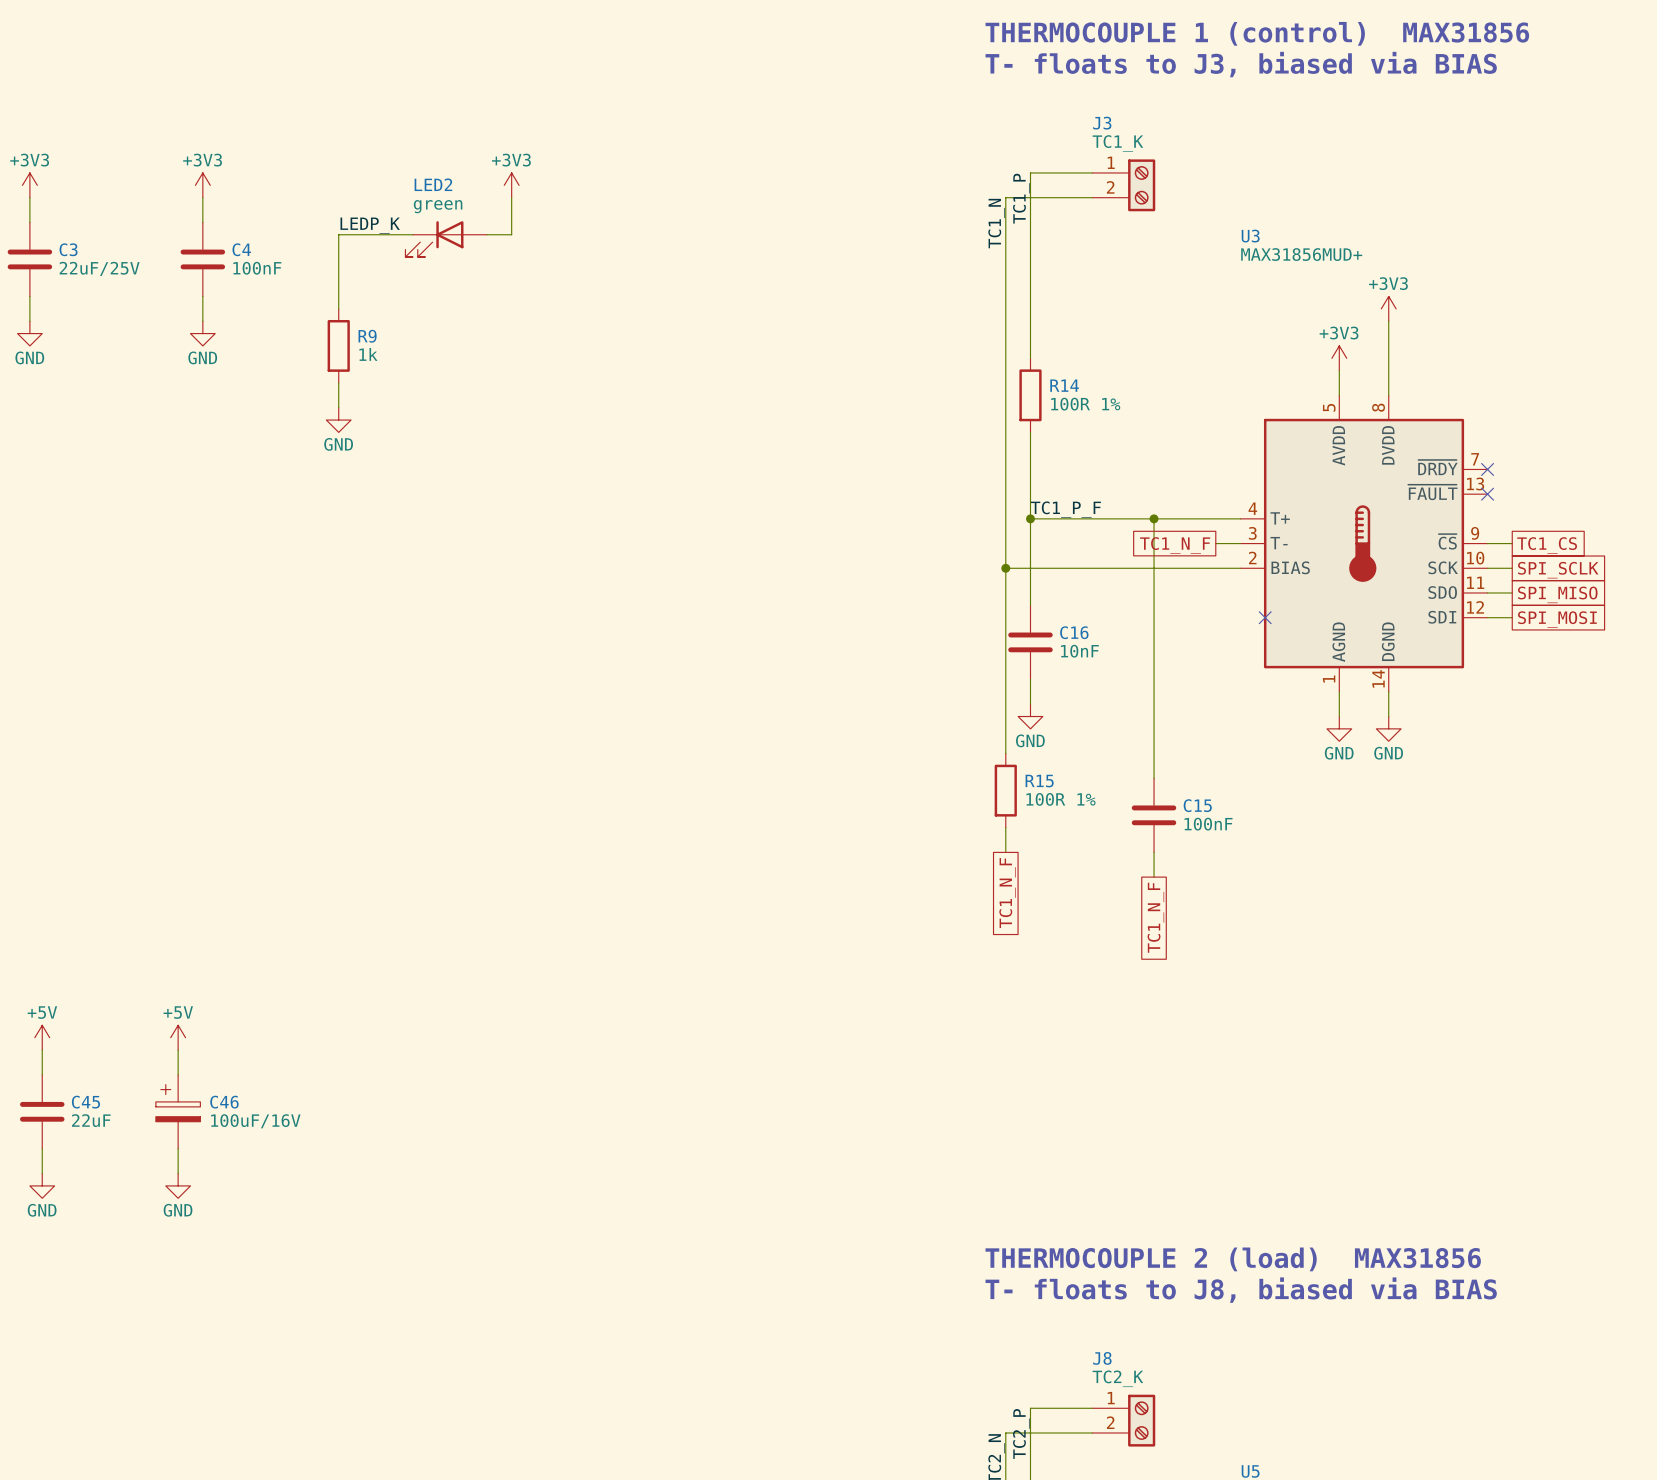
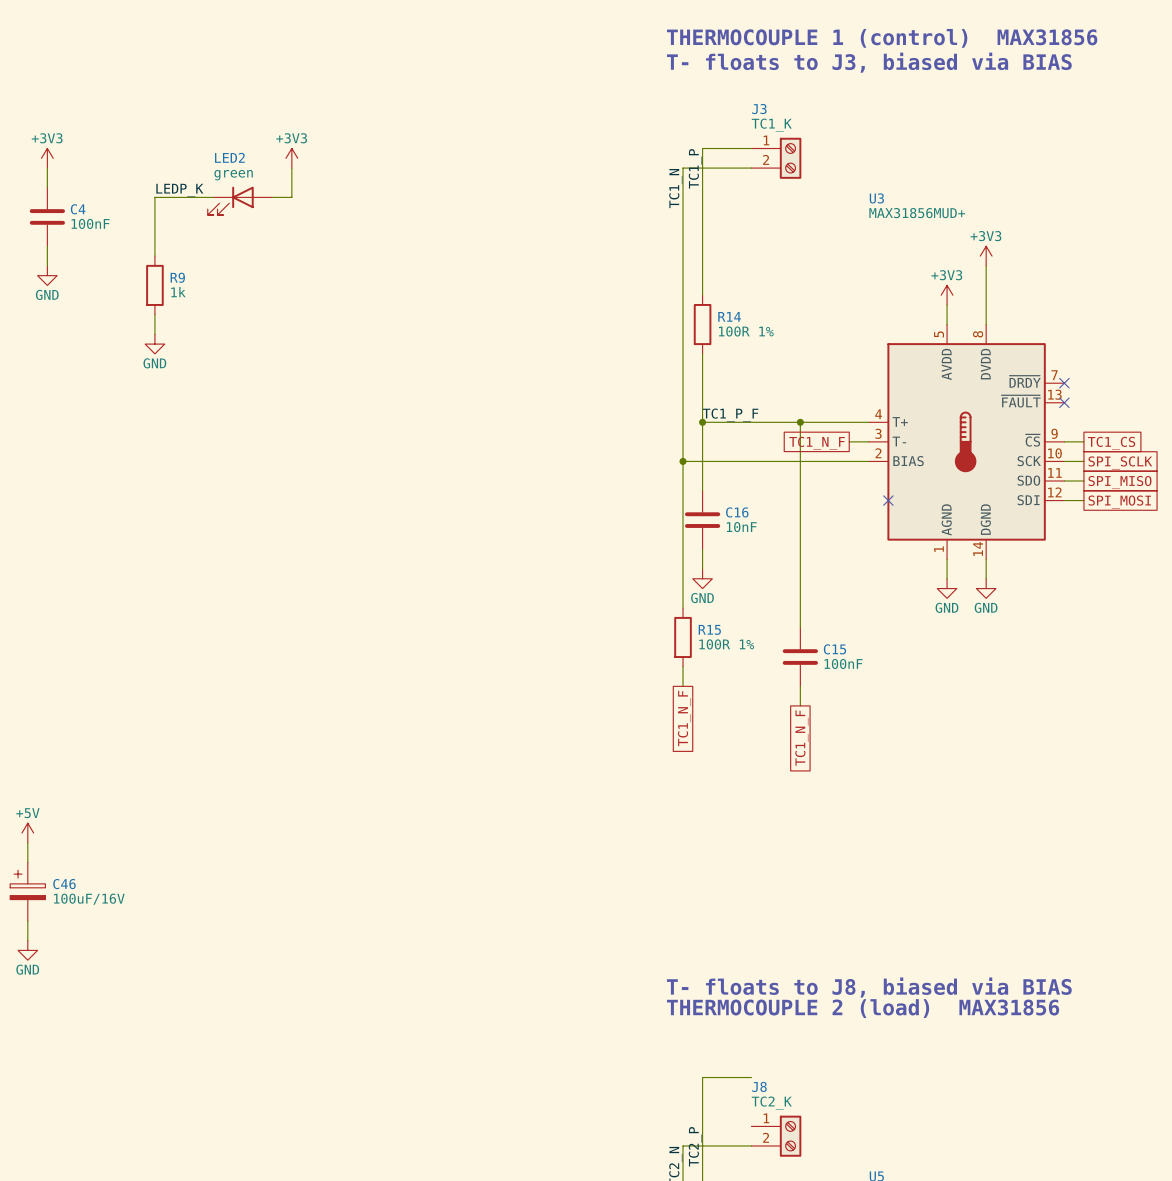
text position: T- floats to J8, biased via BIAS (1241, 1290) -> T- floats to J8, biased via BIAS (869, 987)
wire: (1030, 1408) (1092, 1408) -> (702, 1126) (702, 1077) (751, 1077)

